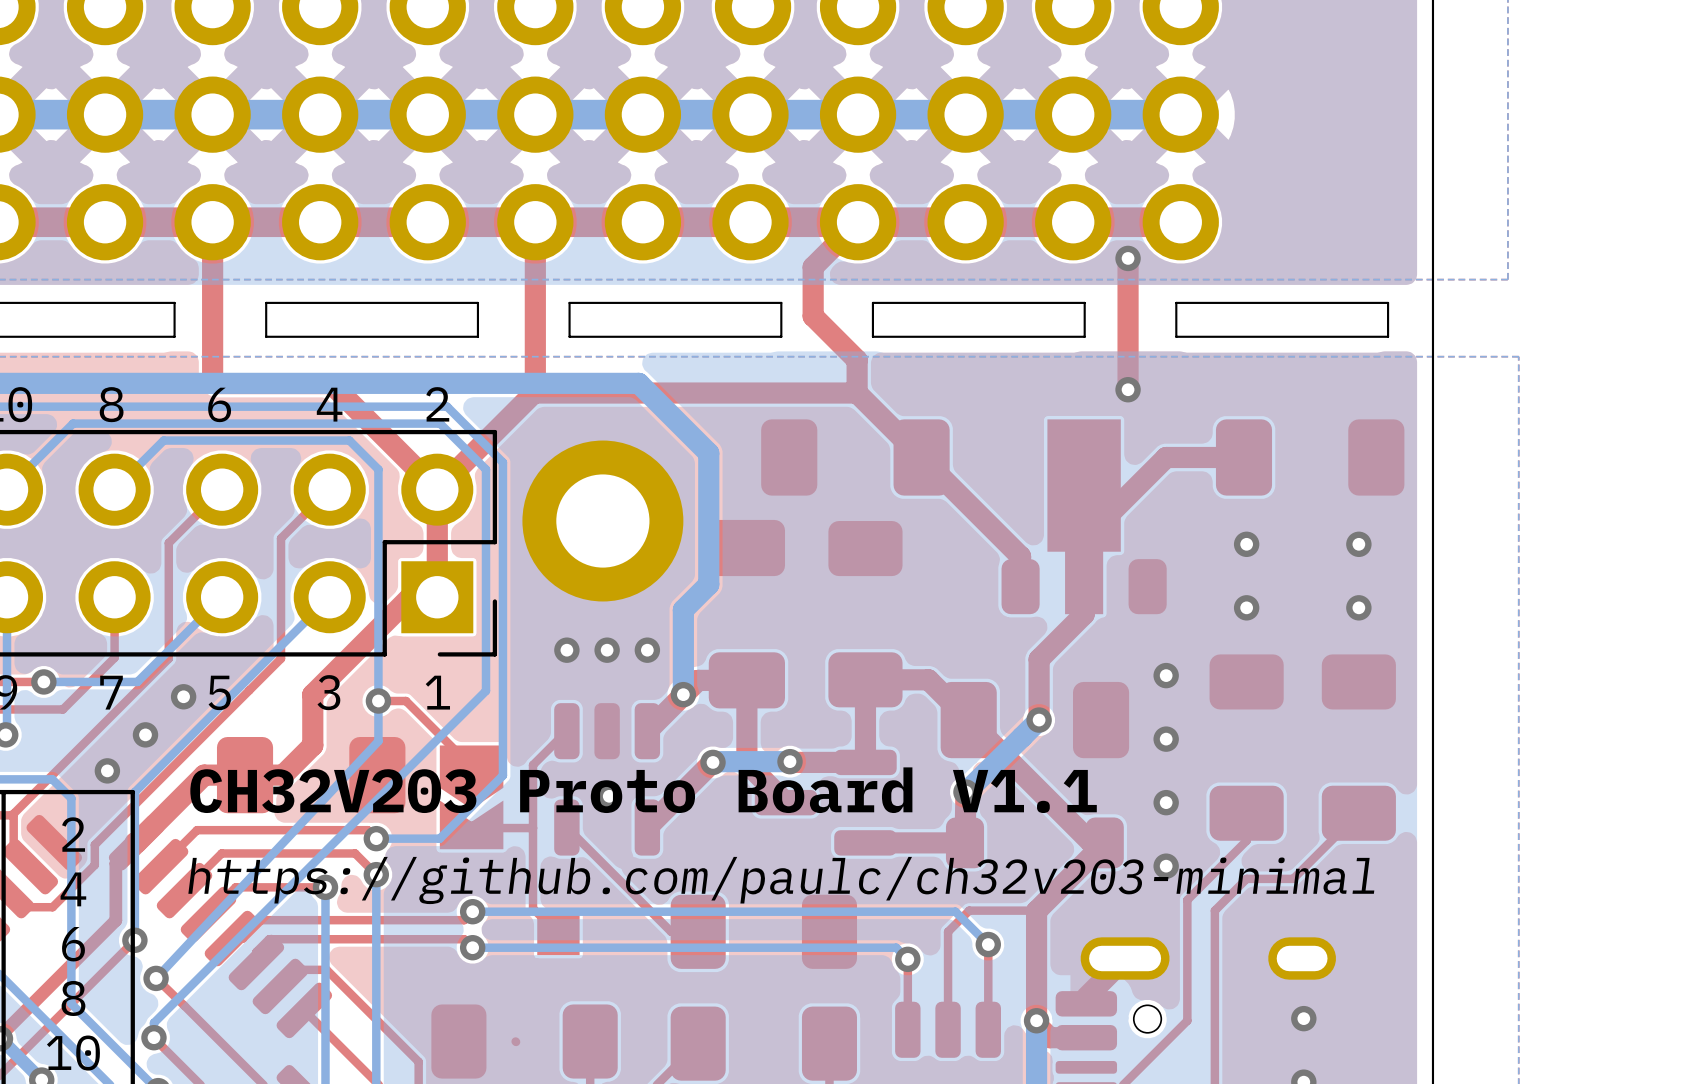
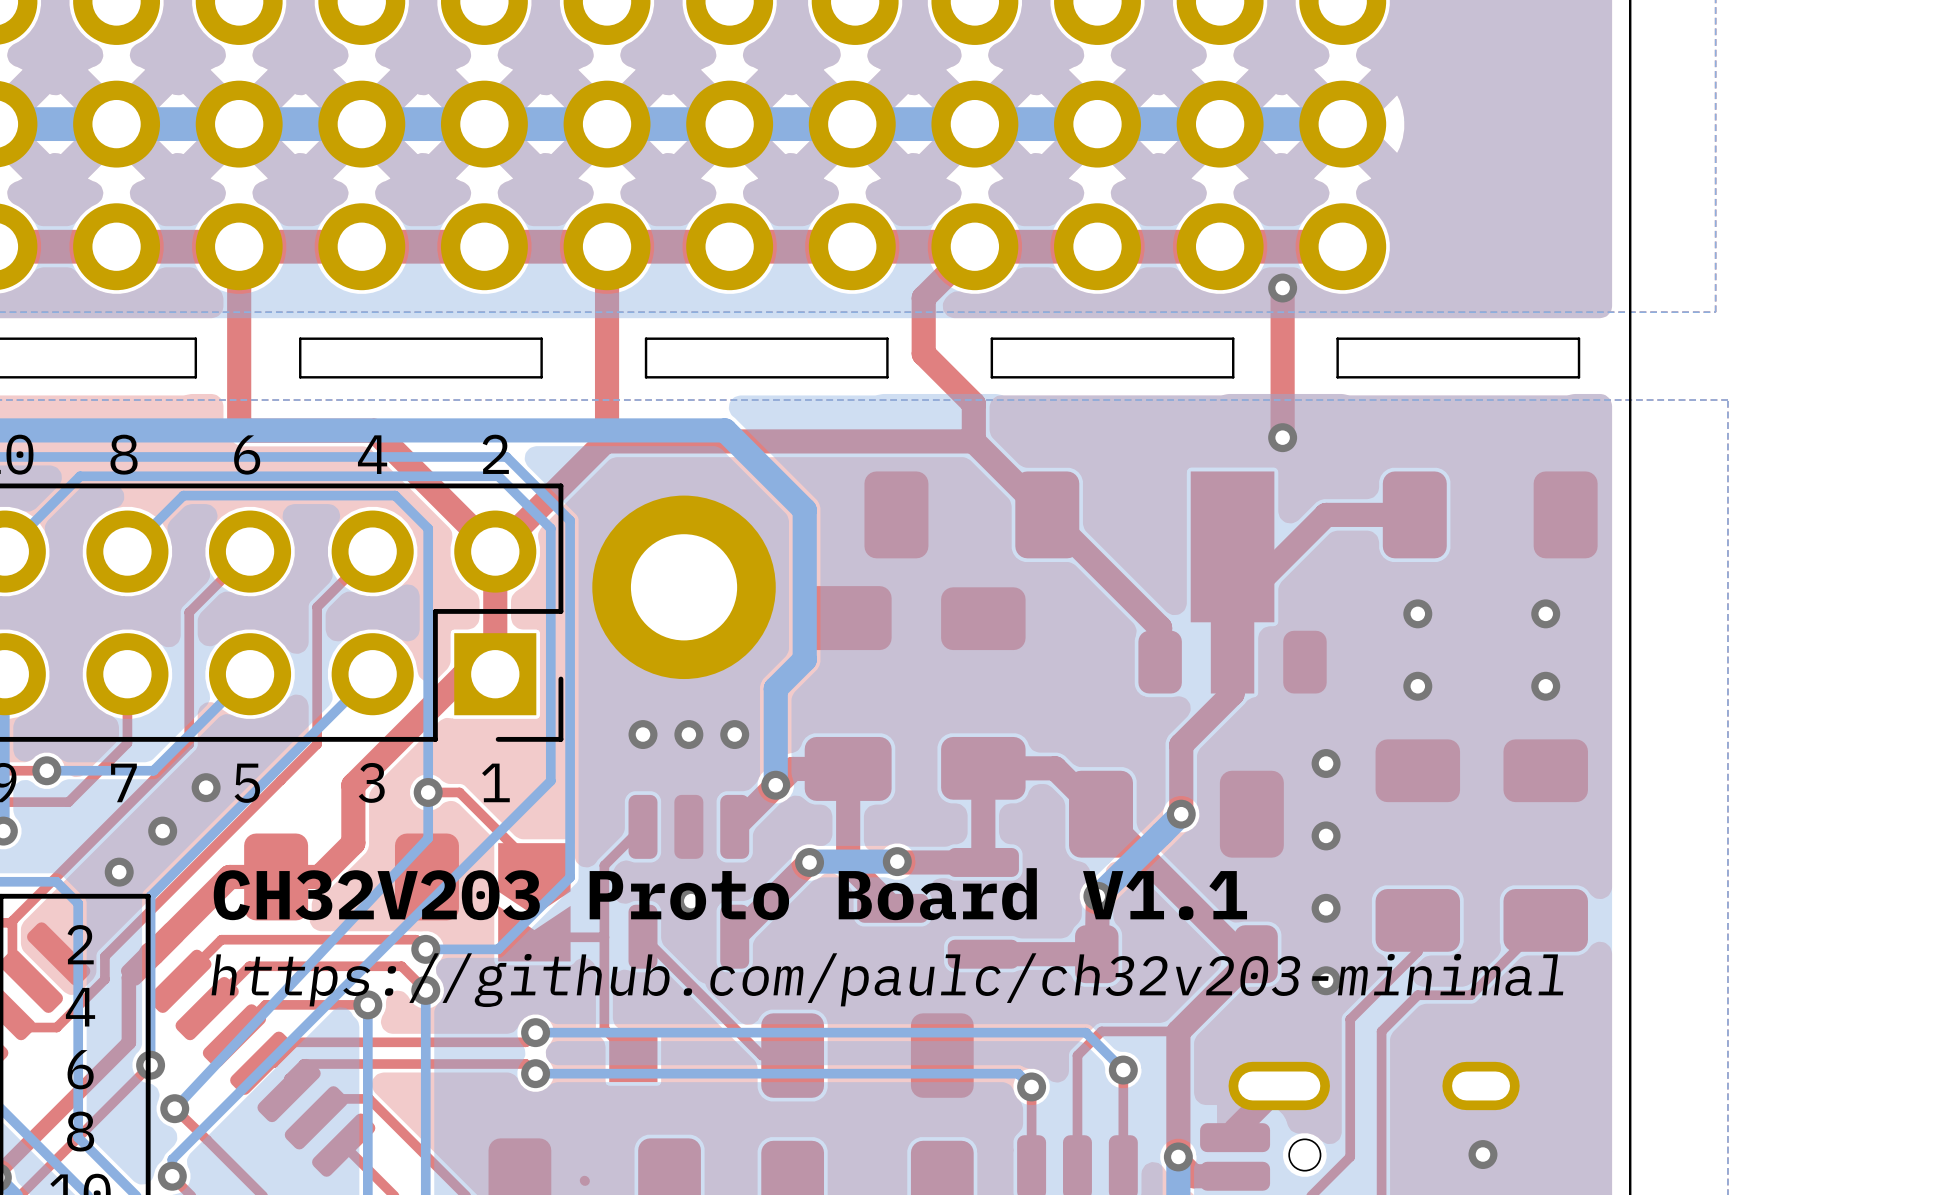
text position: https://github.com/paulc/ch32v203-minimal (781, 880) -> https://github.com/paulc/ch32v203-minimal (887, 980)

